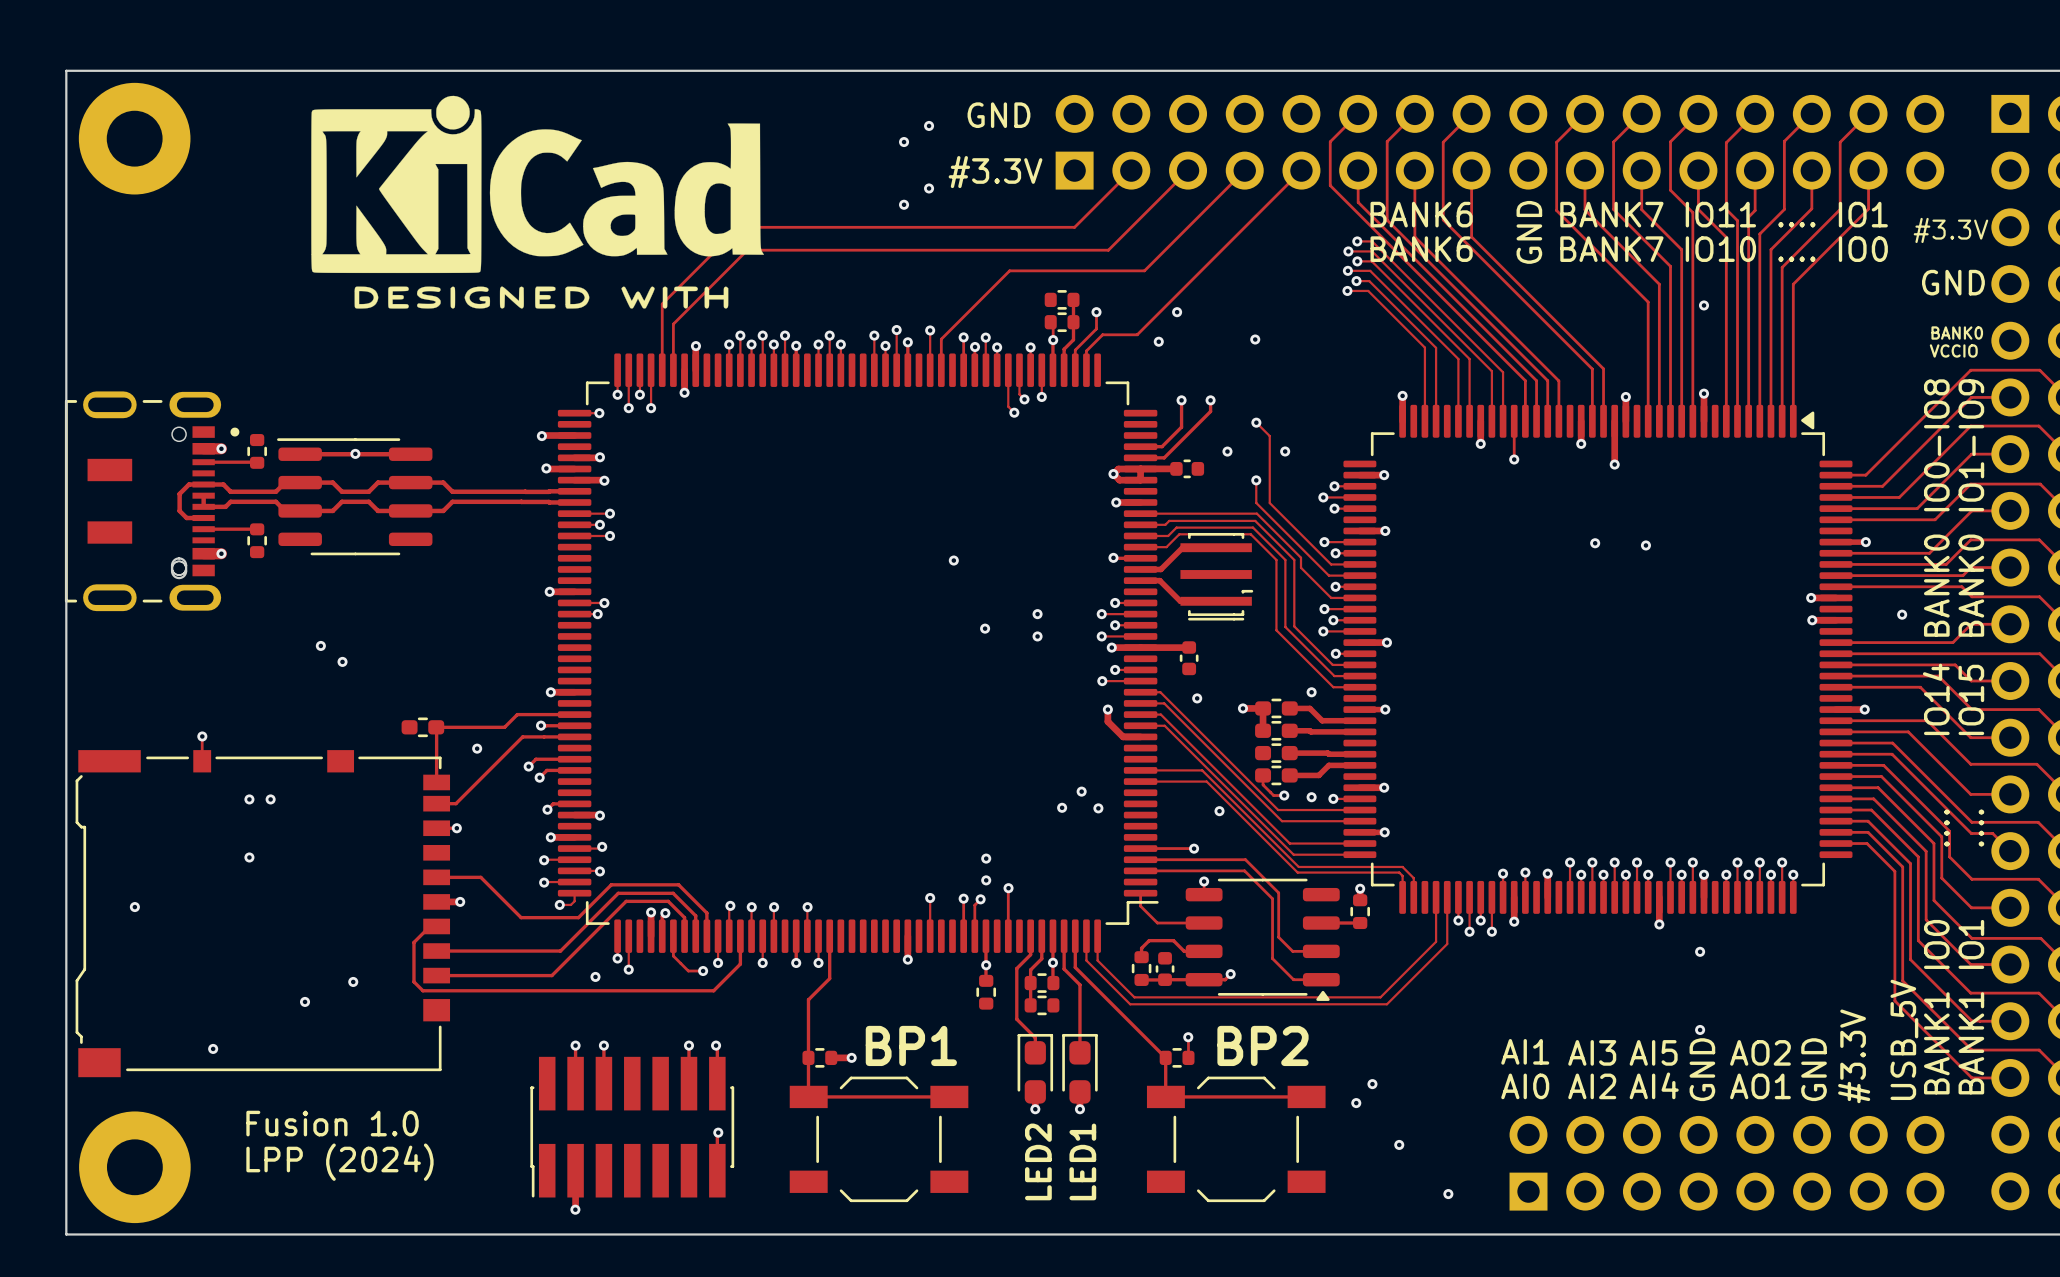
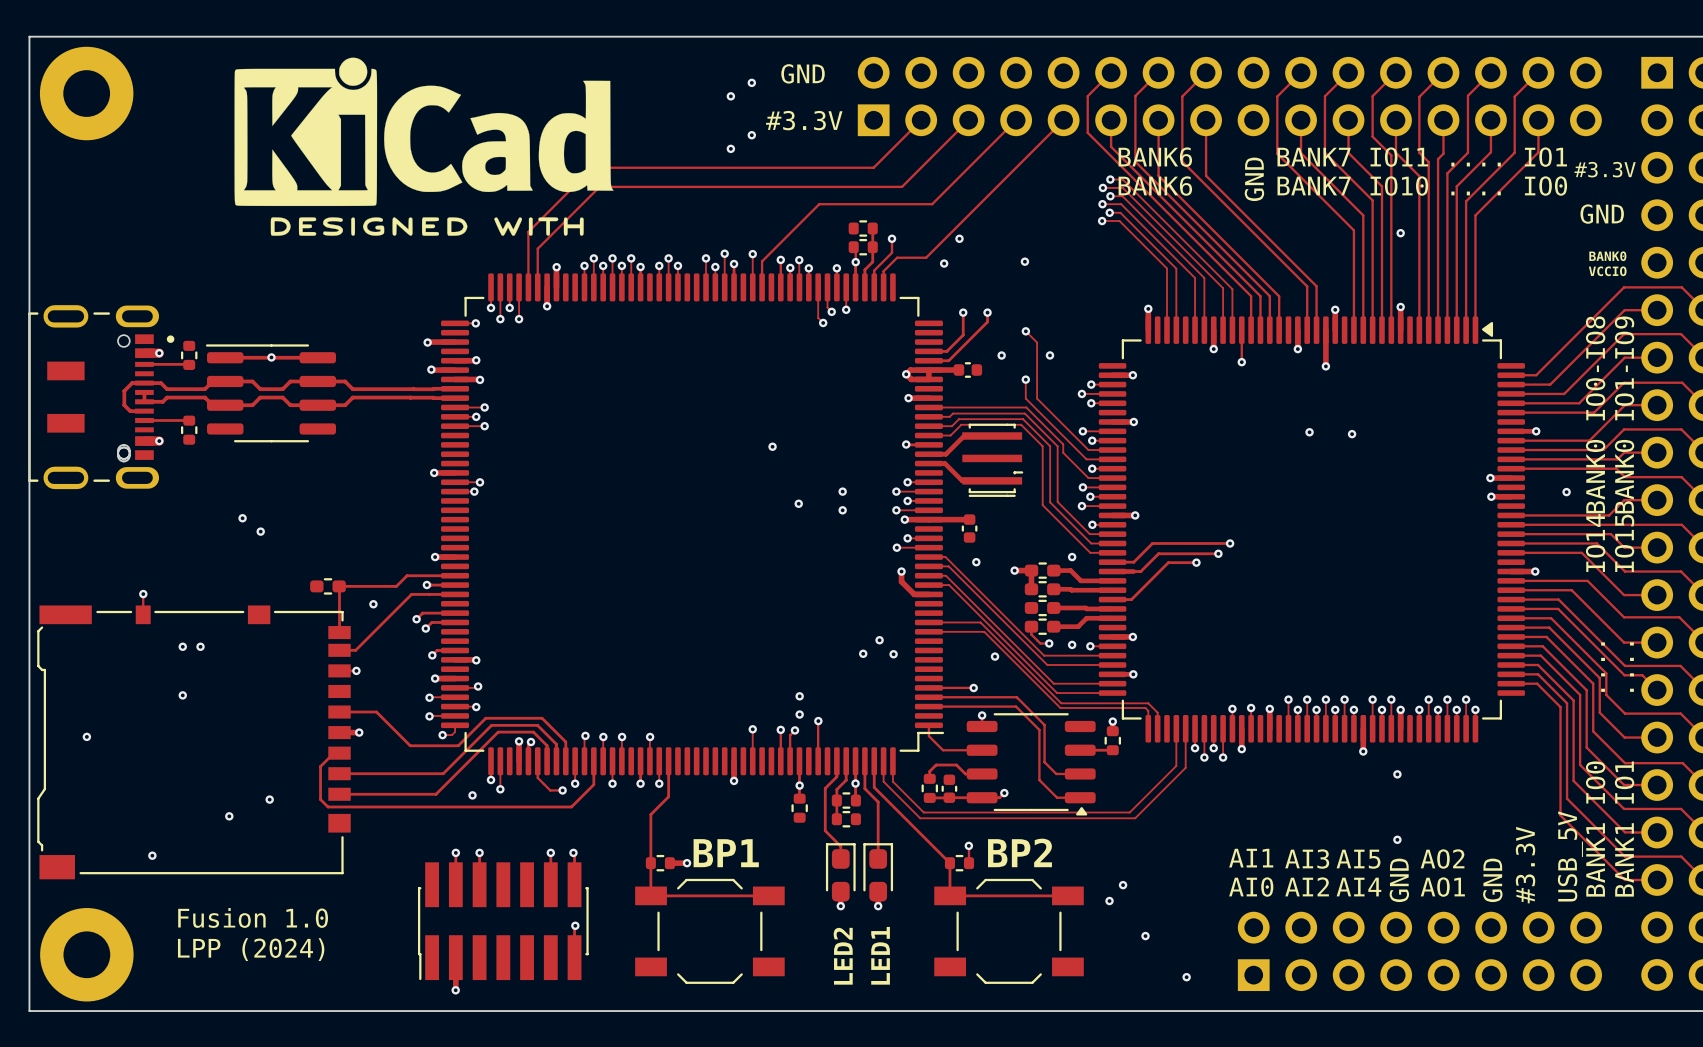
track: none -> (1230, 543) (1152, 543) (1133, 562) (1112, 562)
via: none -> (1230, 543)
track: none -> (1218, 553) (1158, 553) (1140, 571) (1133, 571)
via: none -> (1218, 553)
track: none -> (1196, 562) (1168, 562) (1131, 599) (1112, 599)
via: none -> (1196, 562)
via: (1385, 709) -> none

